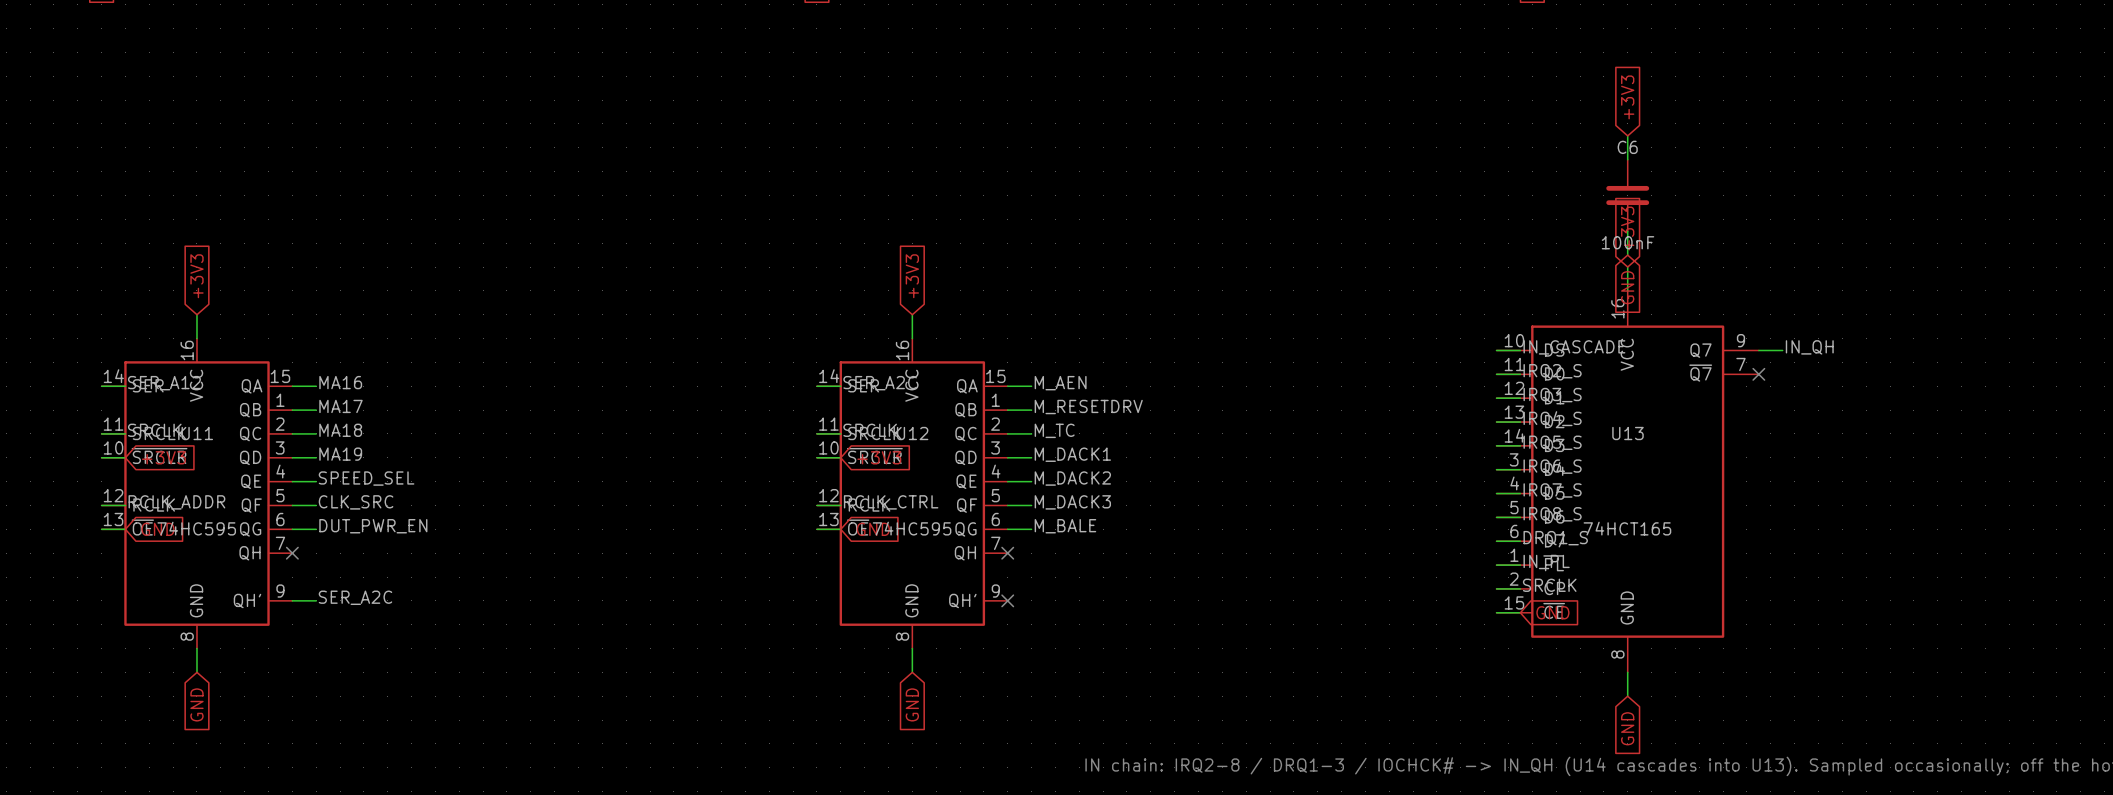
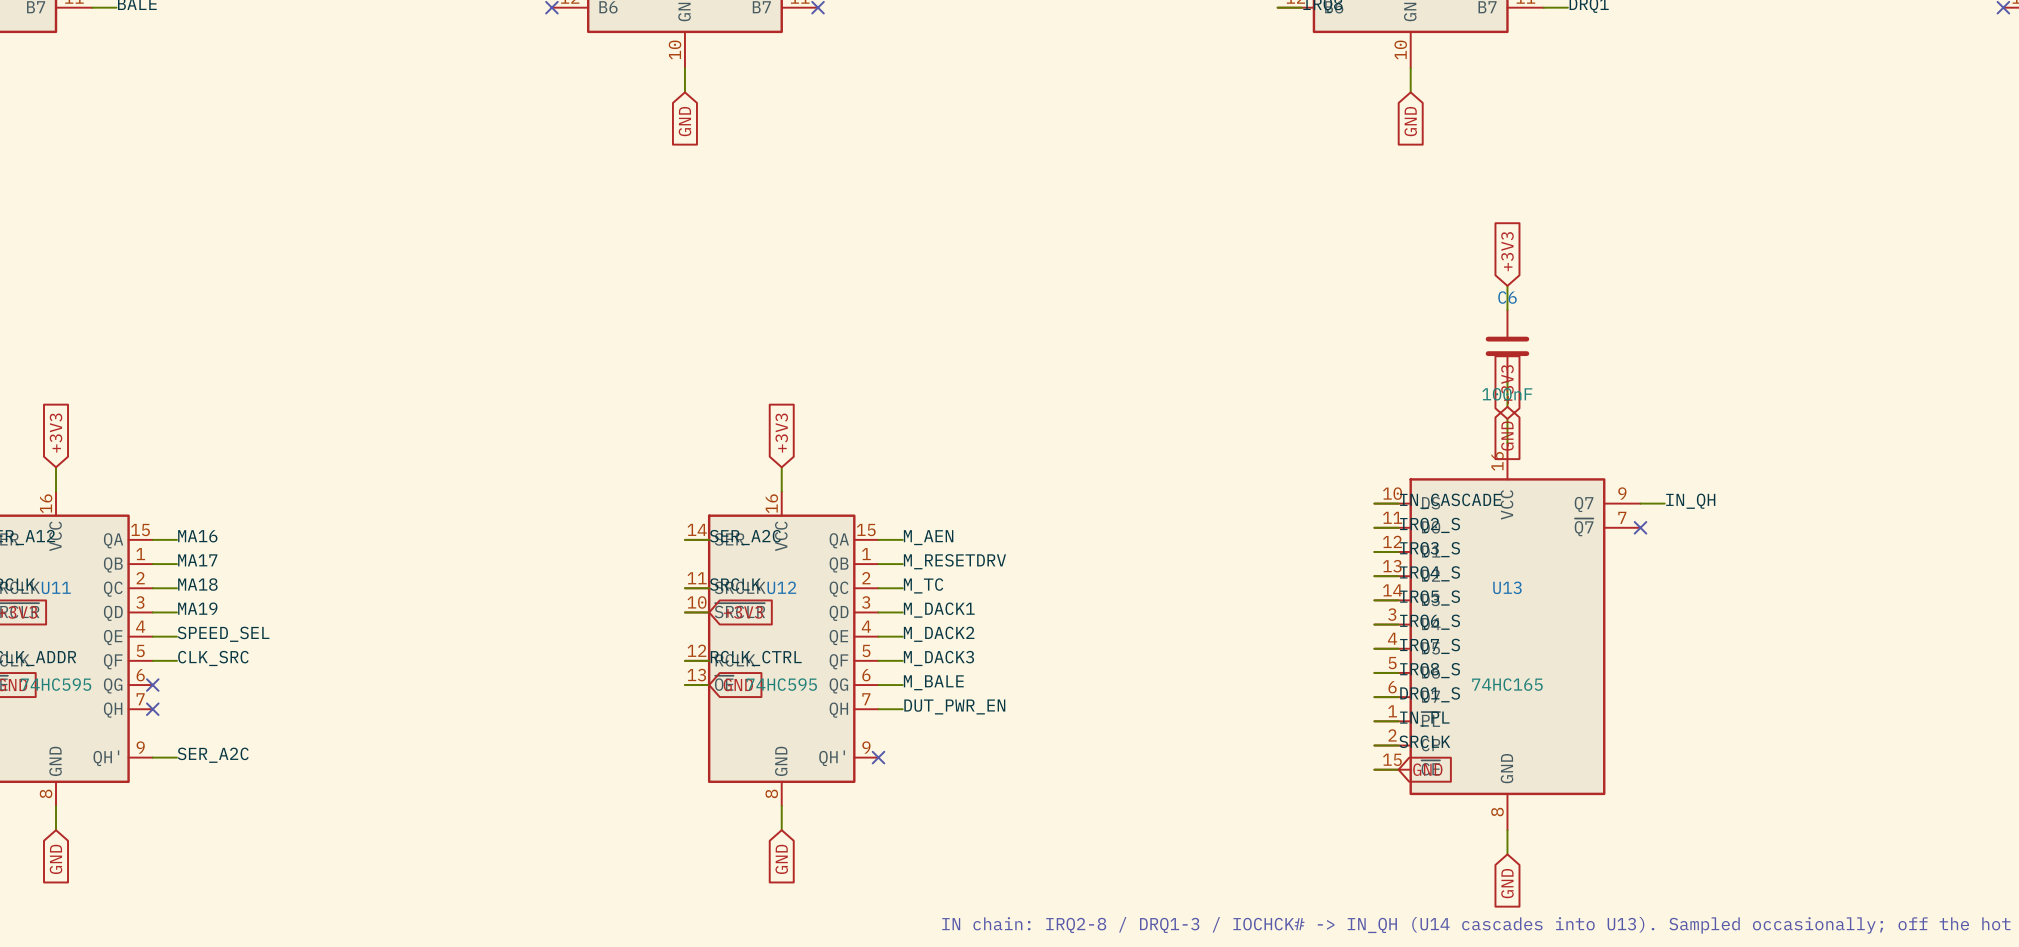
label: DUT_PWR_EN (373, 526) -> none
U13 value: 74HCT165 (1627, 528) -> 74HC165 (1507, 684)
wire: (292, 529) (316, 529) -> none
no-connect mark: none -> (152, 685)
label: none -> DUT_PWR_EN (954, 706)
wire: none -> (878, 709) (902, 709)
no-connect mark: (1007, 553) -> none

